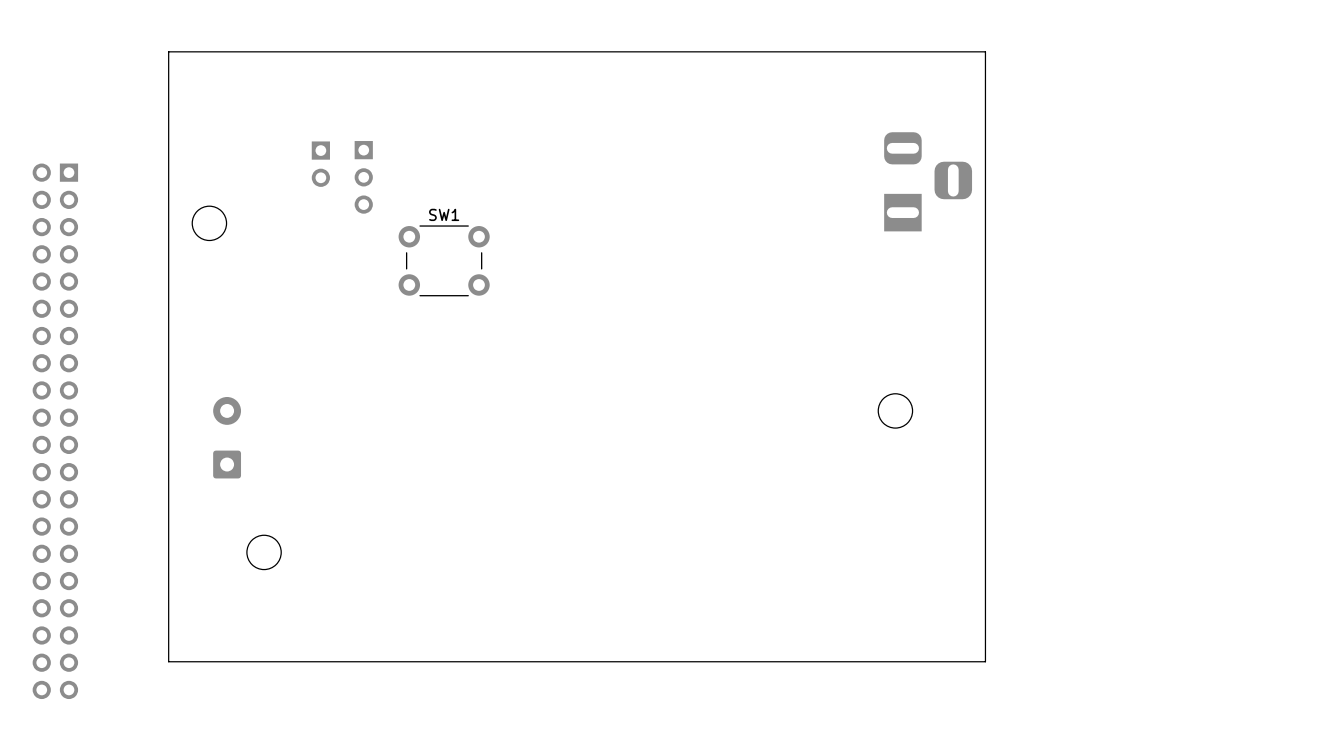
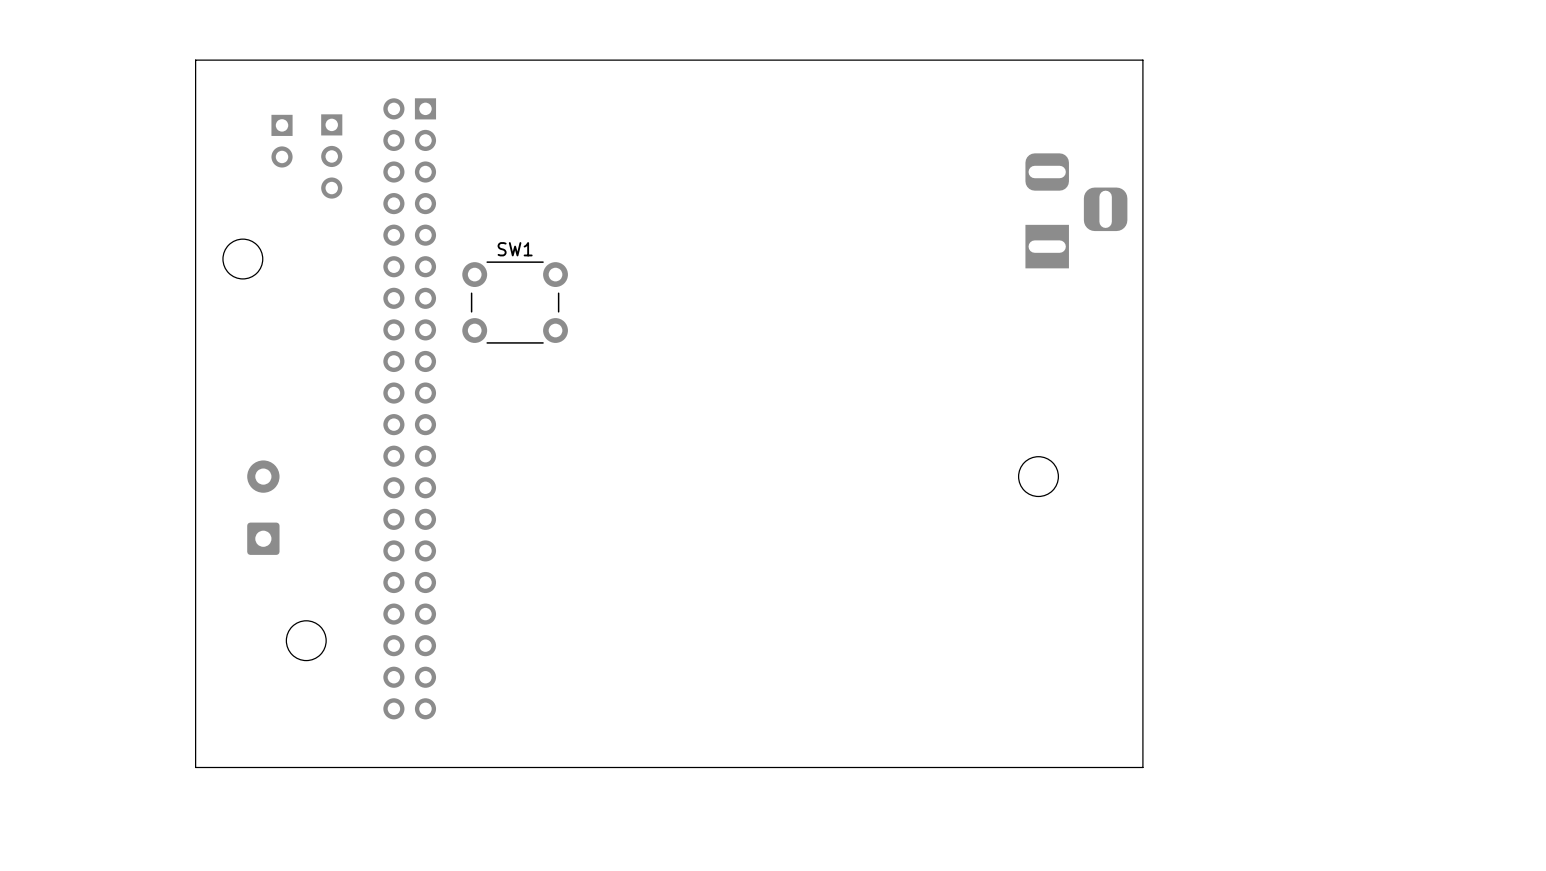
part position: (320, 164) -> (282, 141)
part position: (363, 177) -> (331, 156)
part: none -> (409, 408)
part: (55, 431) -> none

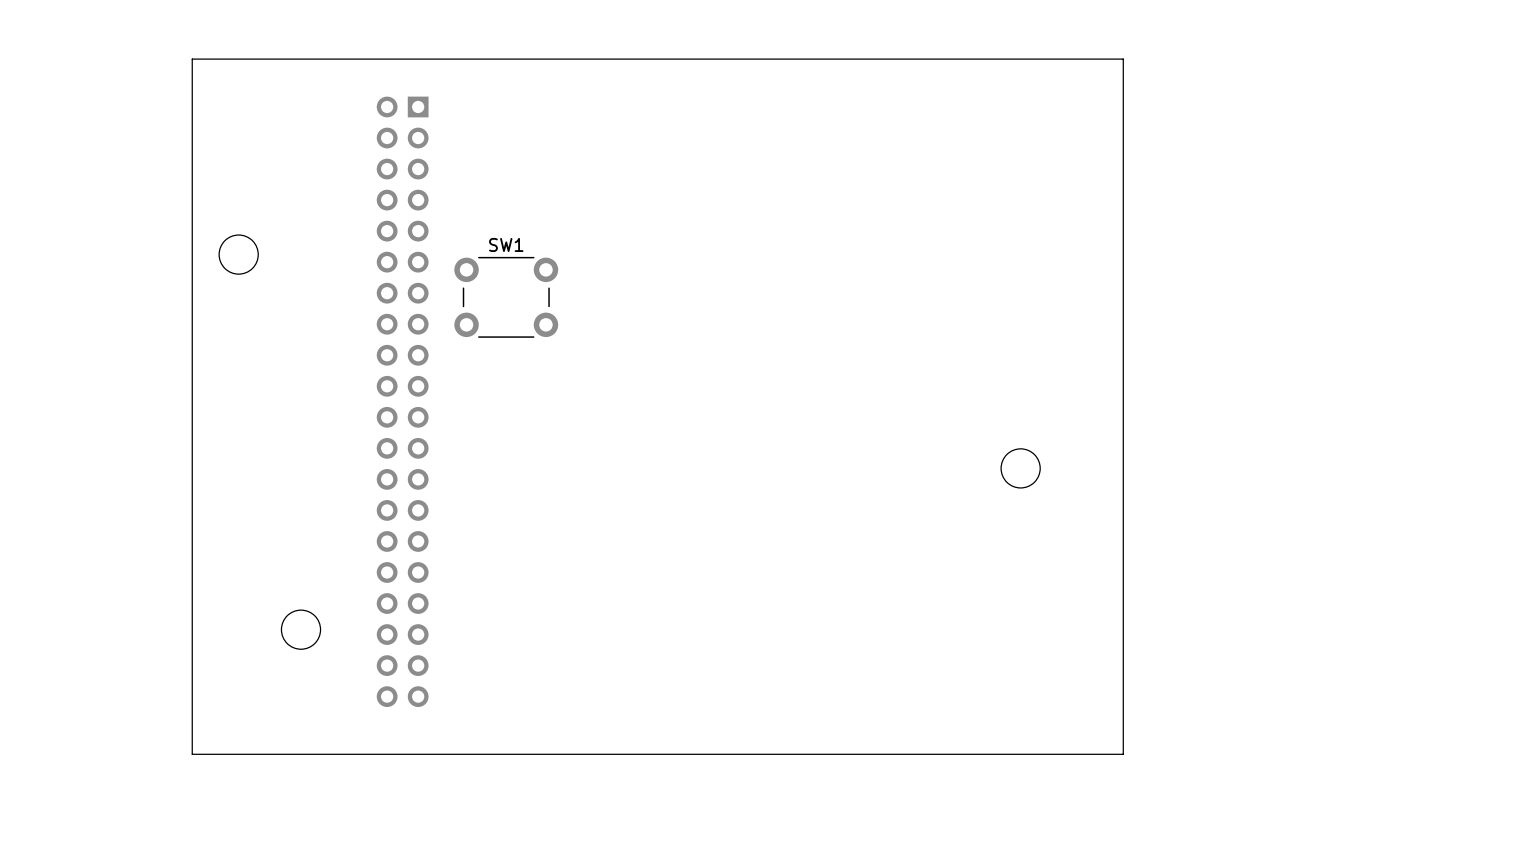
part: (282, 141) -> none
part: (331, 156) -> none
part: (1076, 210) -> none
part: (263, 507) -> none

